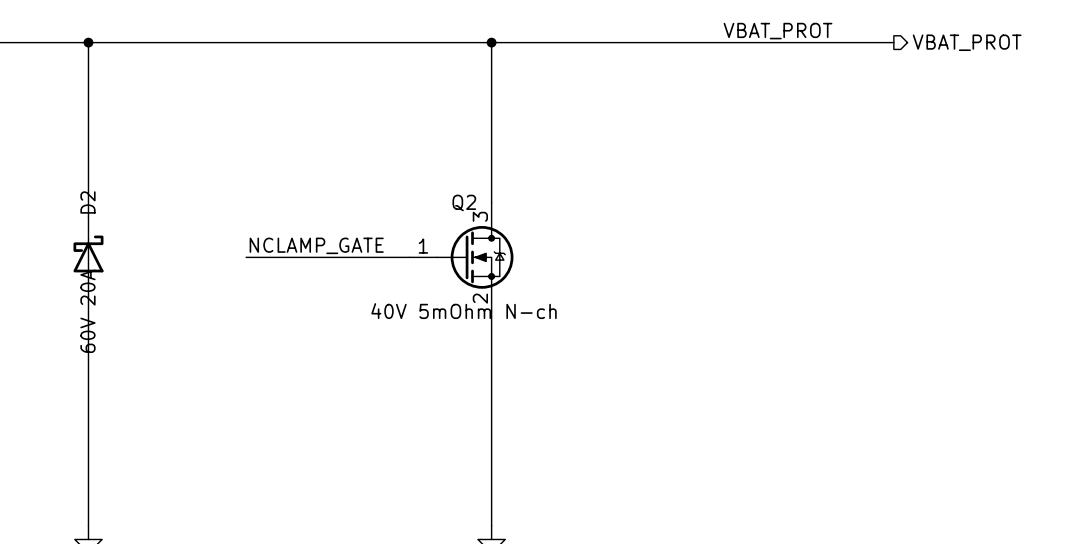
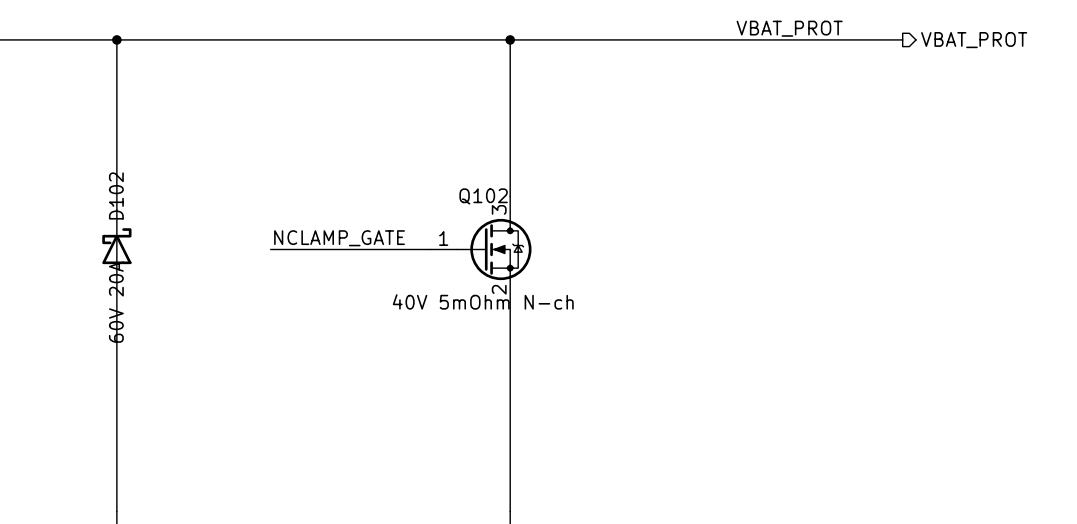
D2 name: D2 (87, 202) -> D102 (116, 195)
Q2 name: Q2 (464, 202) -> Q102 (483, 196)

